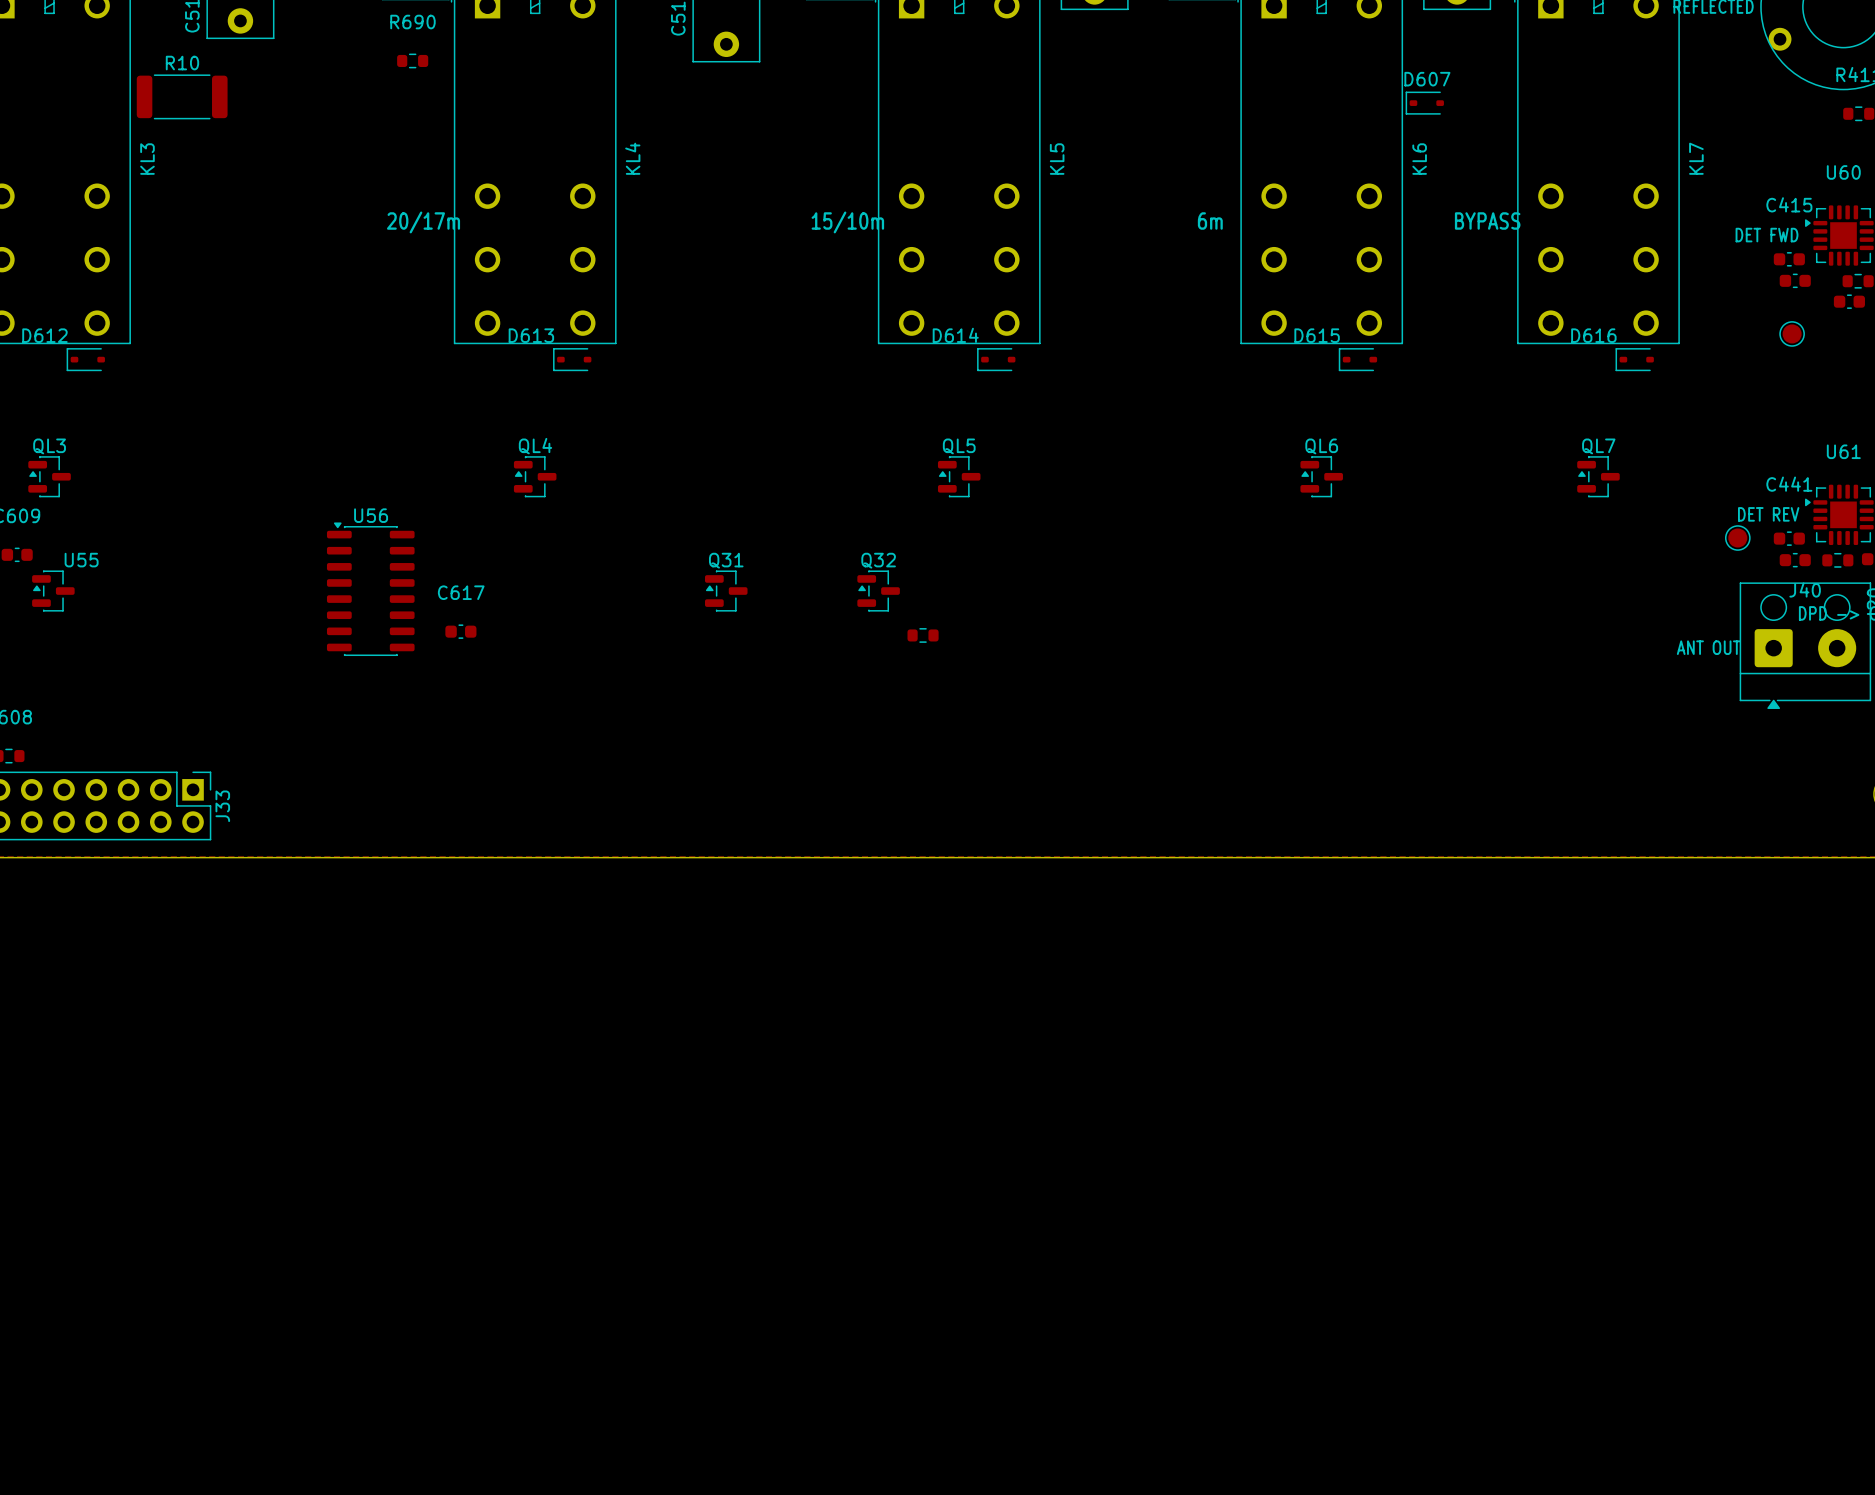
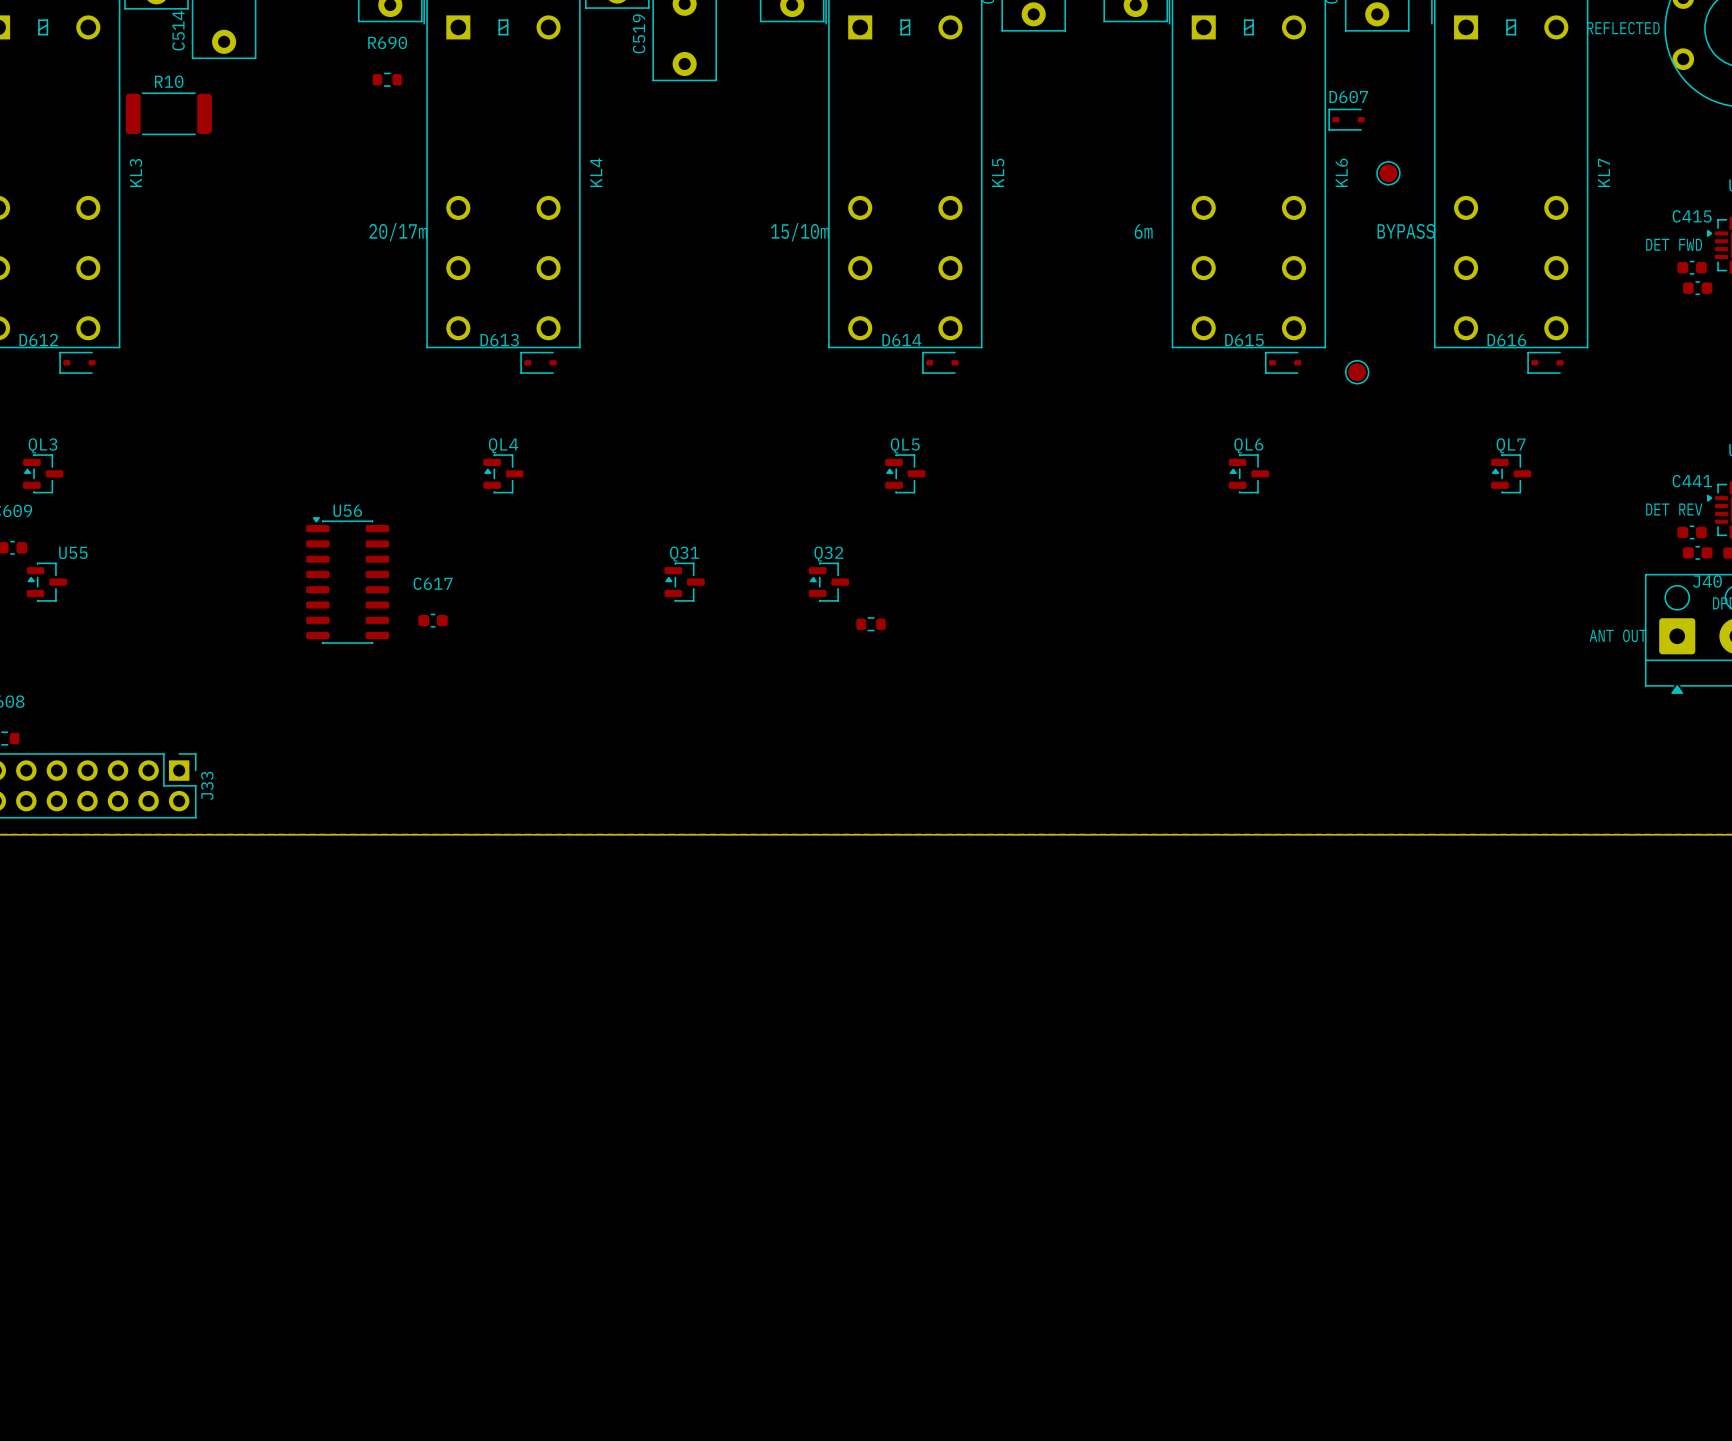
part: none -> (1388, 173)
part: (1792, 333) -> none
part: none -> (1357, 372)
part: (1737, 538) -> none

